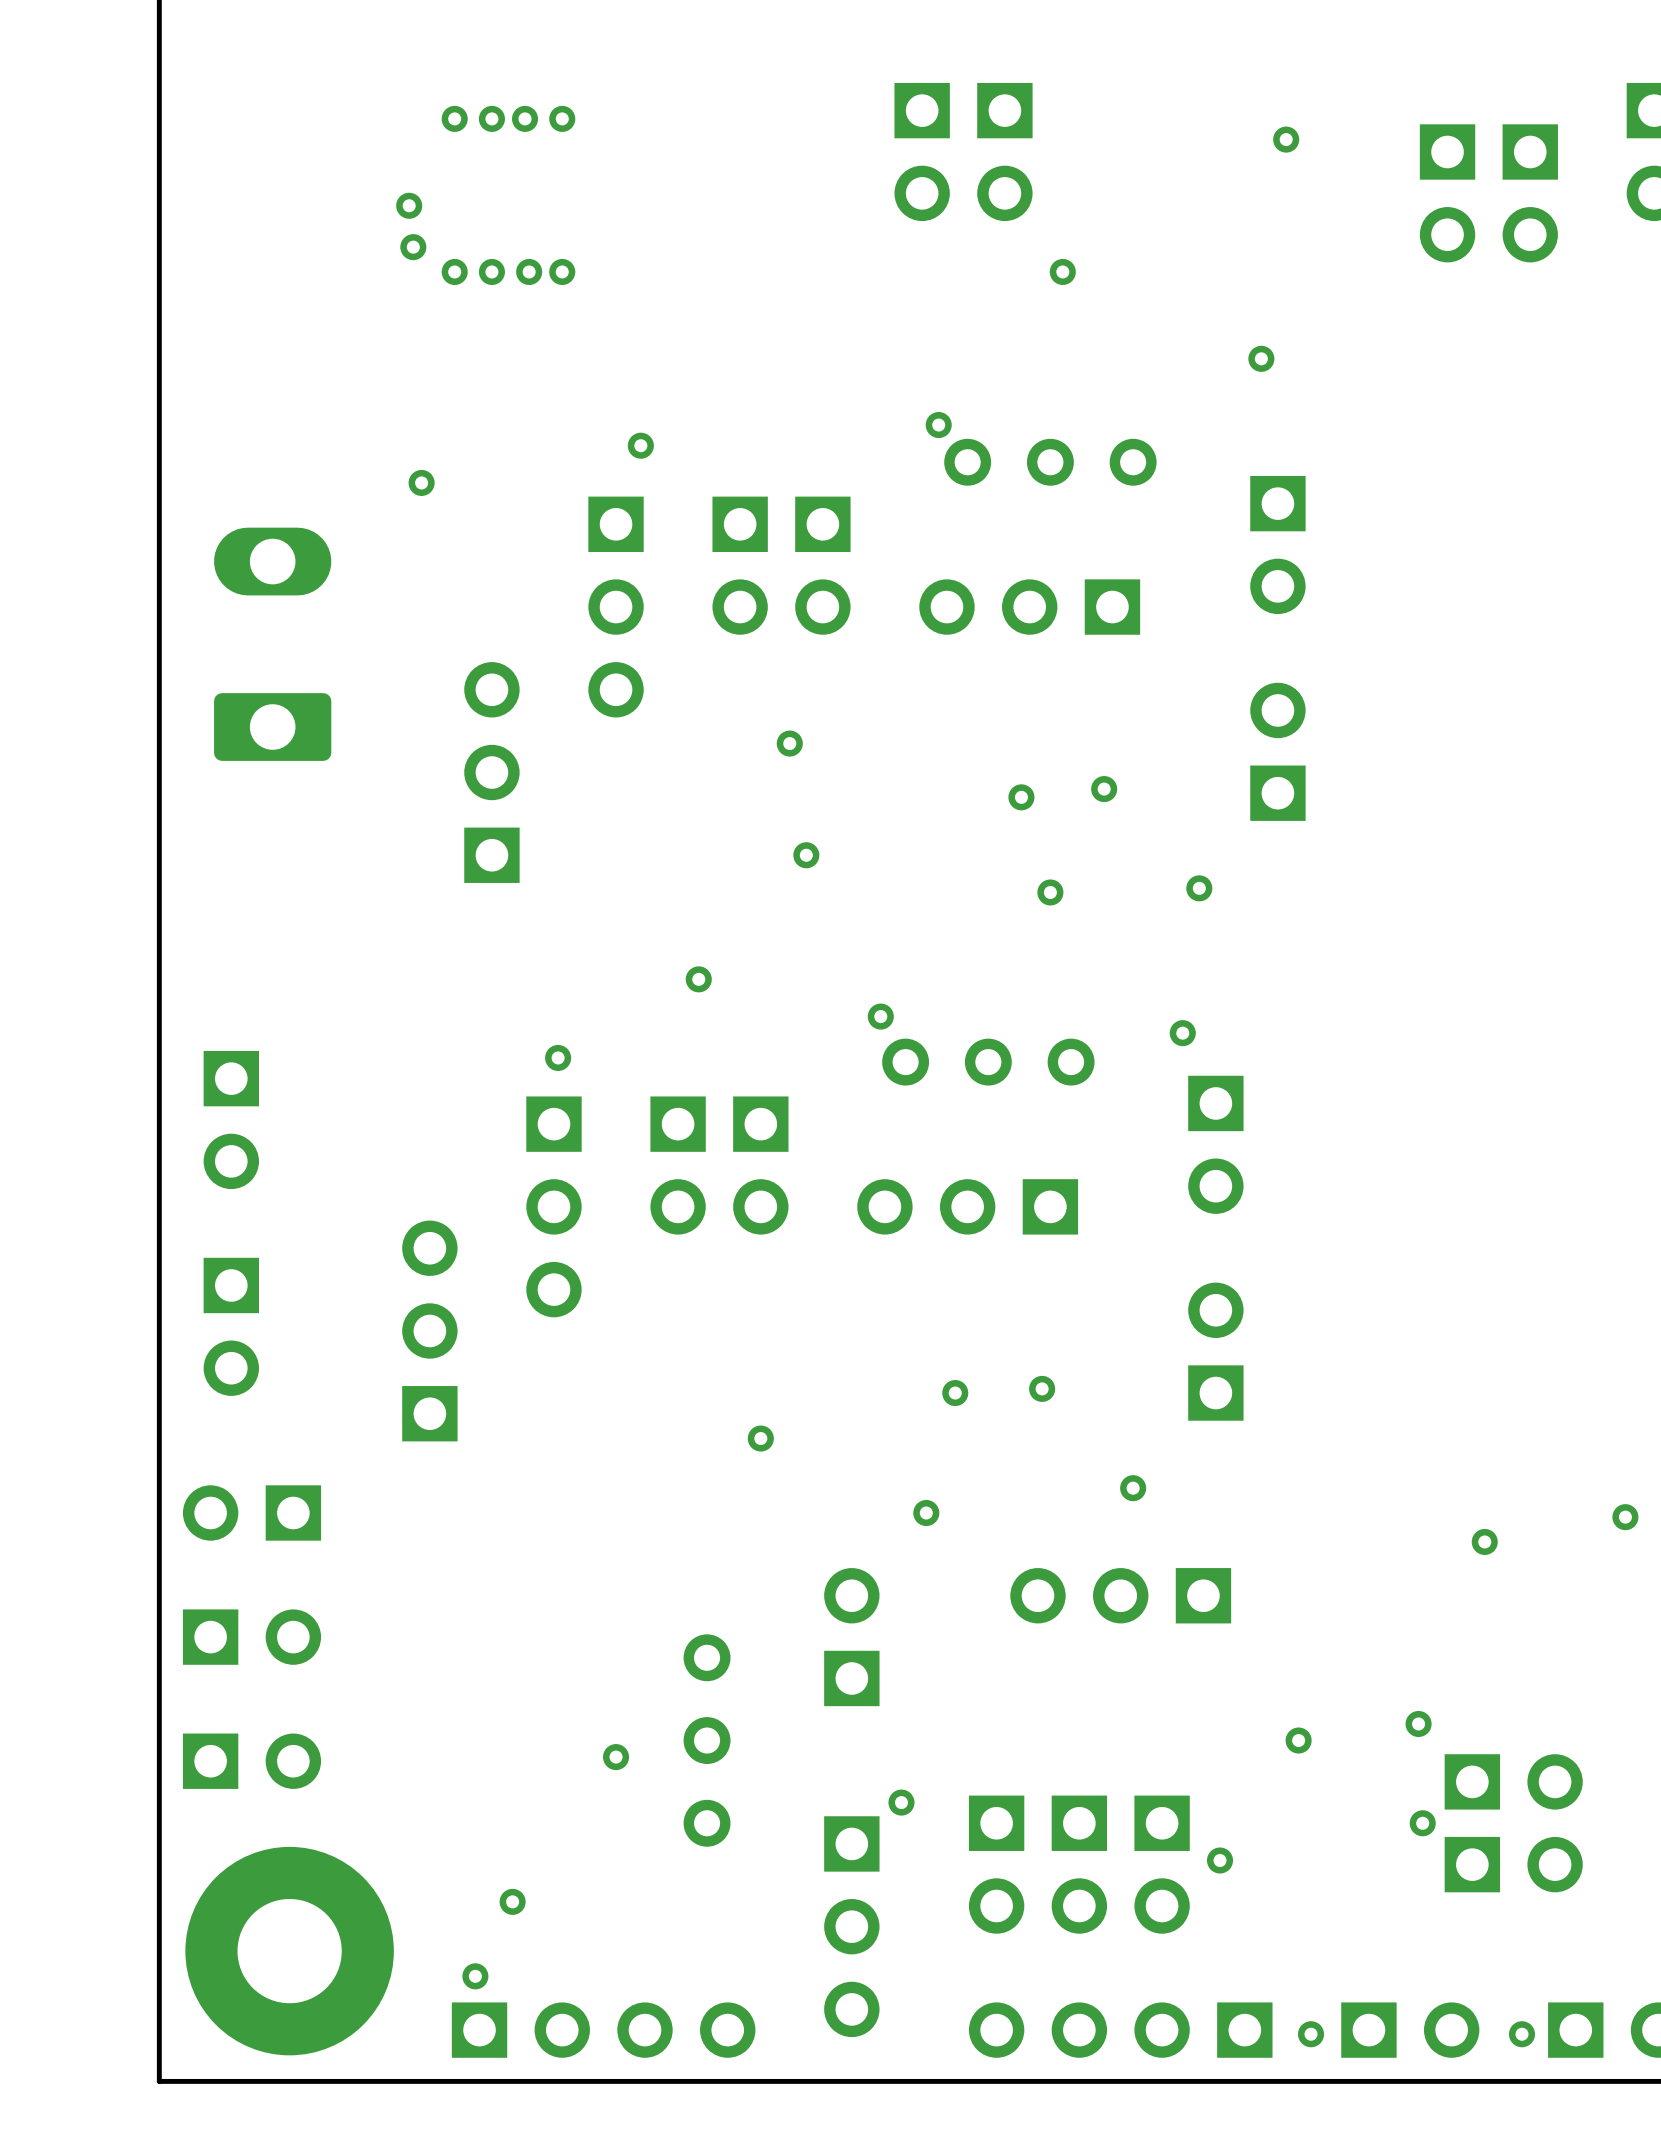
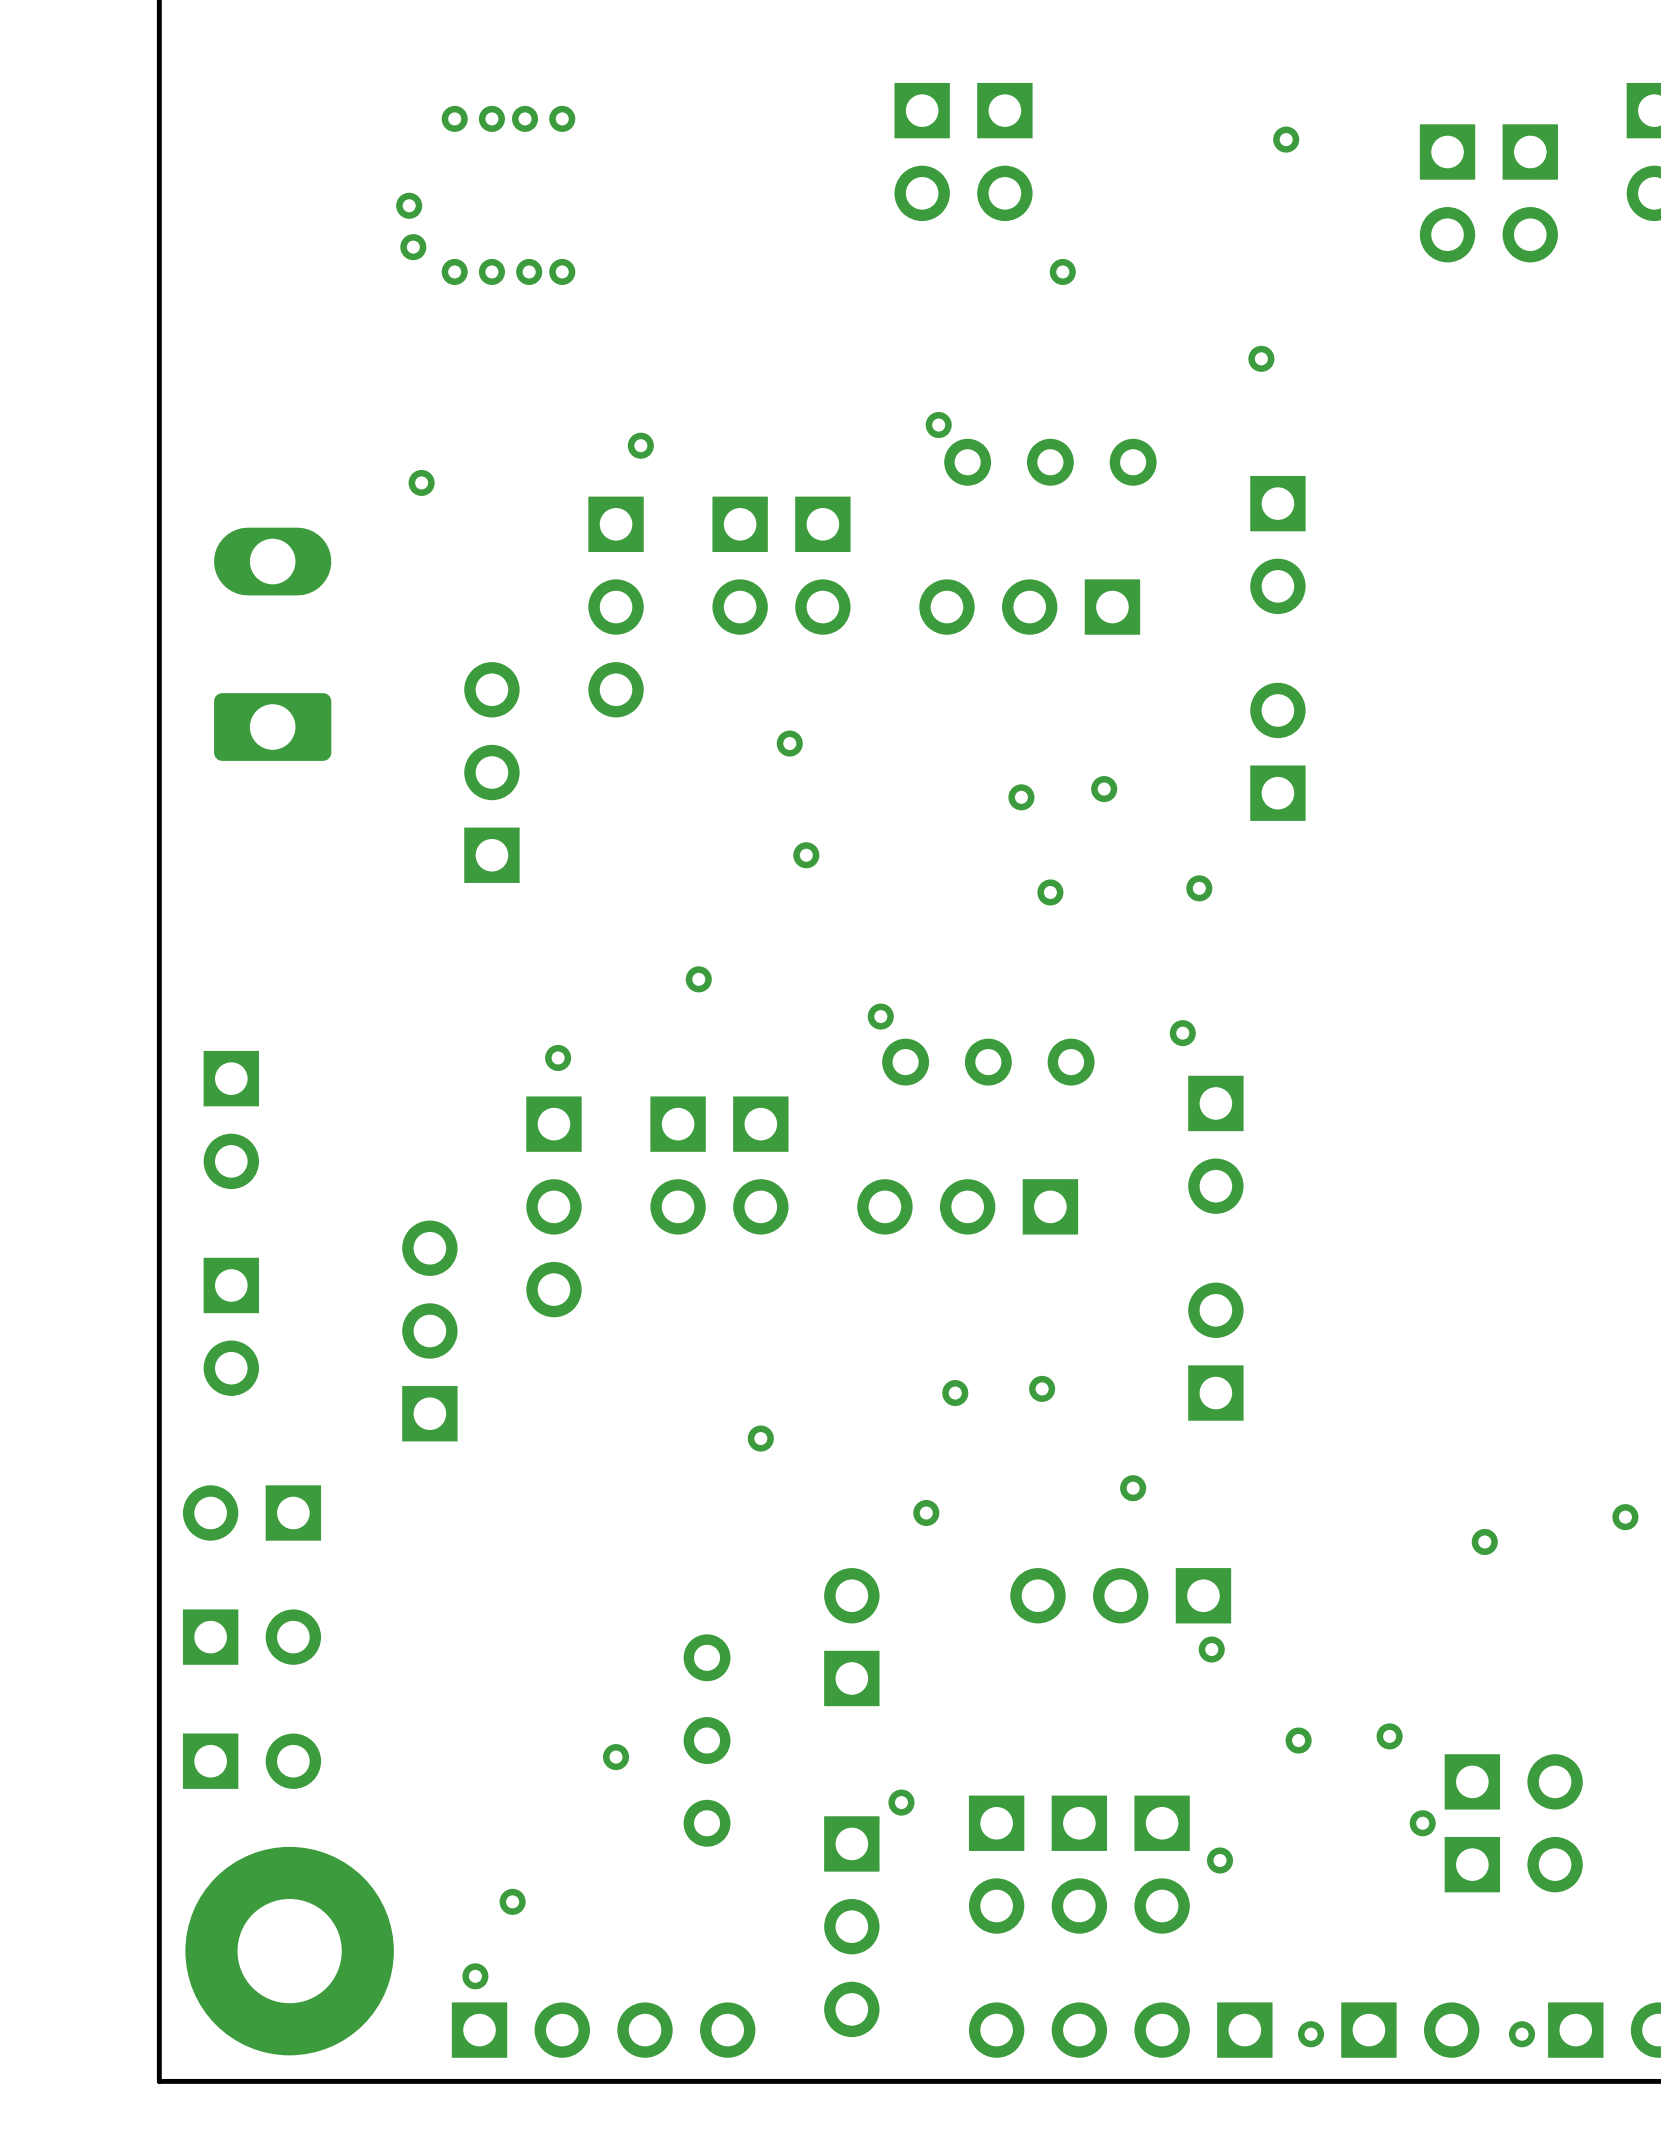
via: none -> (1211, 1649)
via position: (1418, 1723) -> (1389, 1736)

